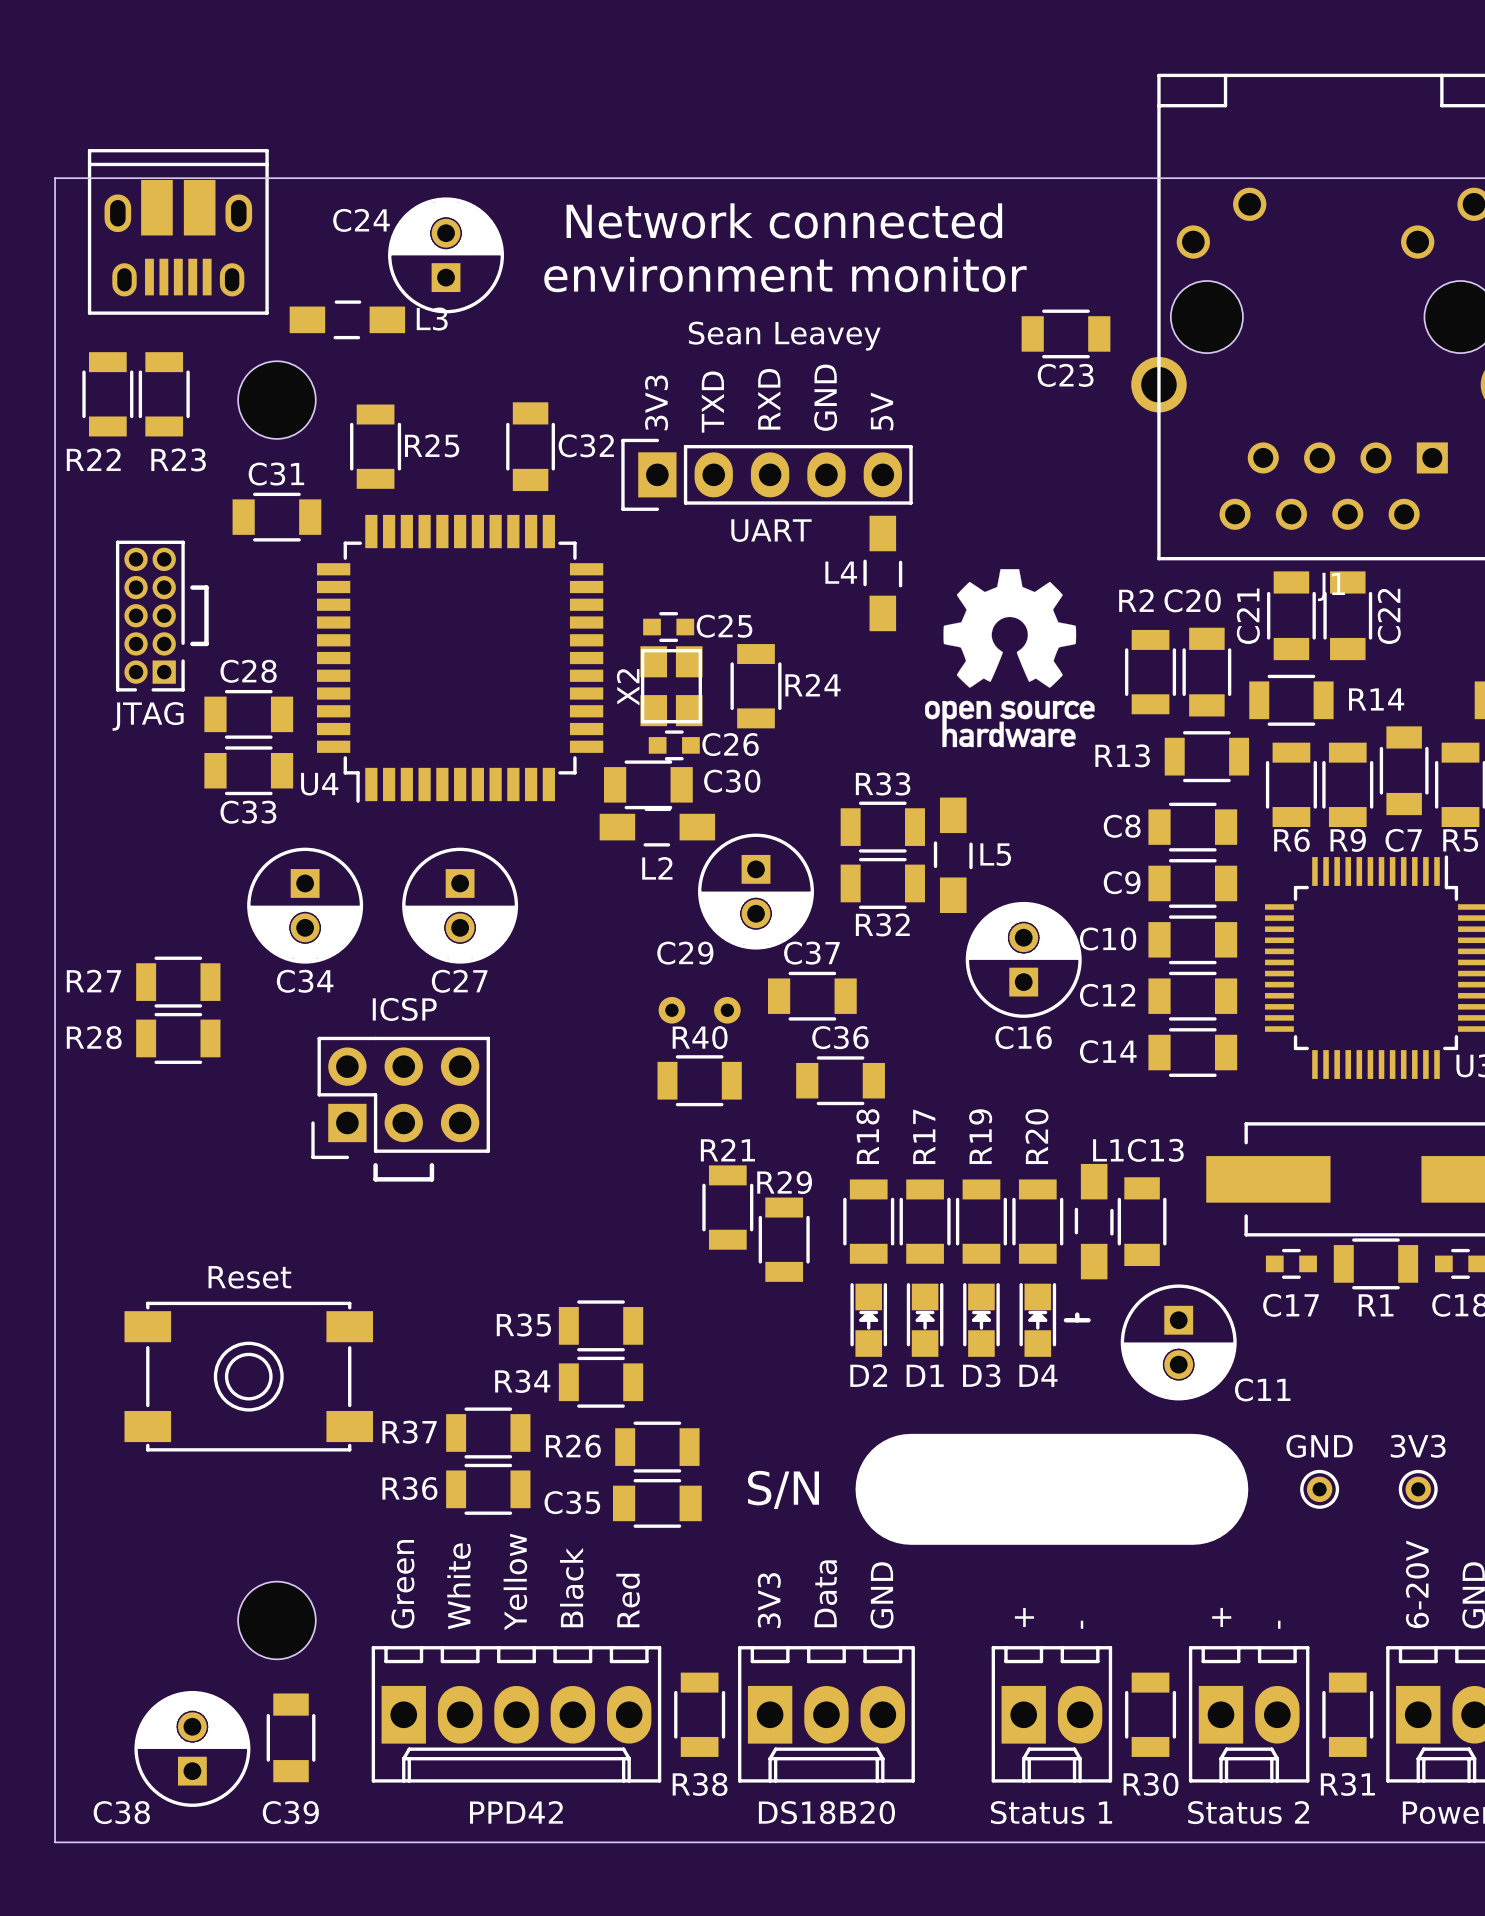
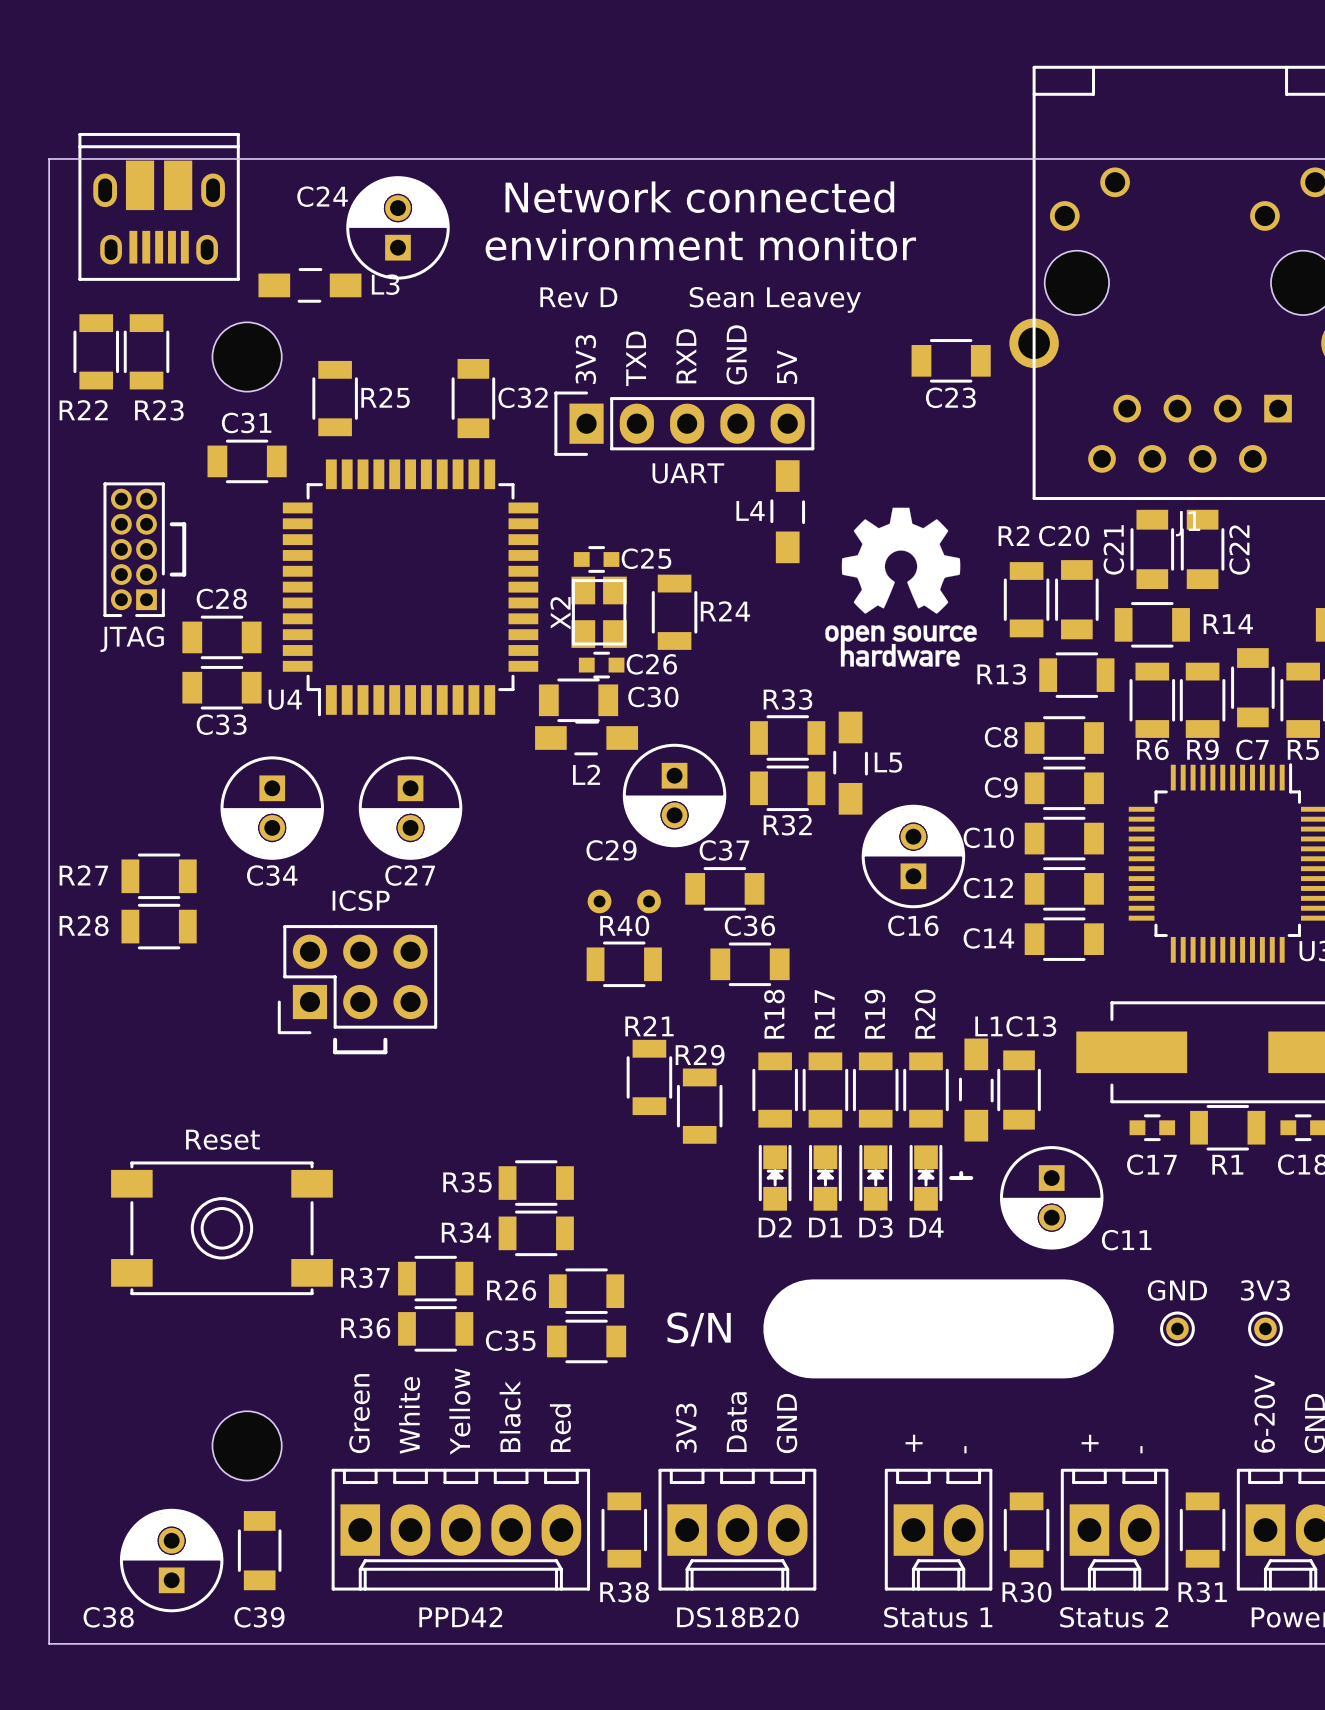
C23 position: (1065, 333) -> (951, 360)
text: Sean Leavey (784, 336) -> Rev D Sean Leavey (700, 299)

